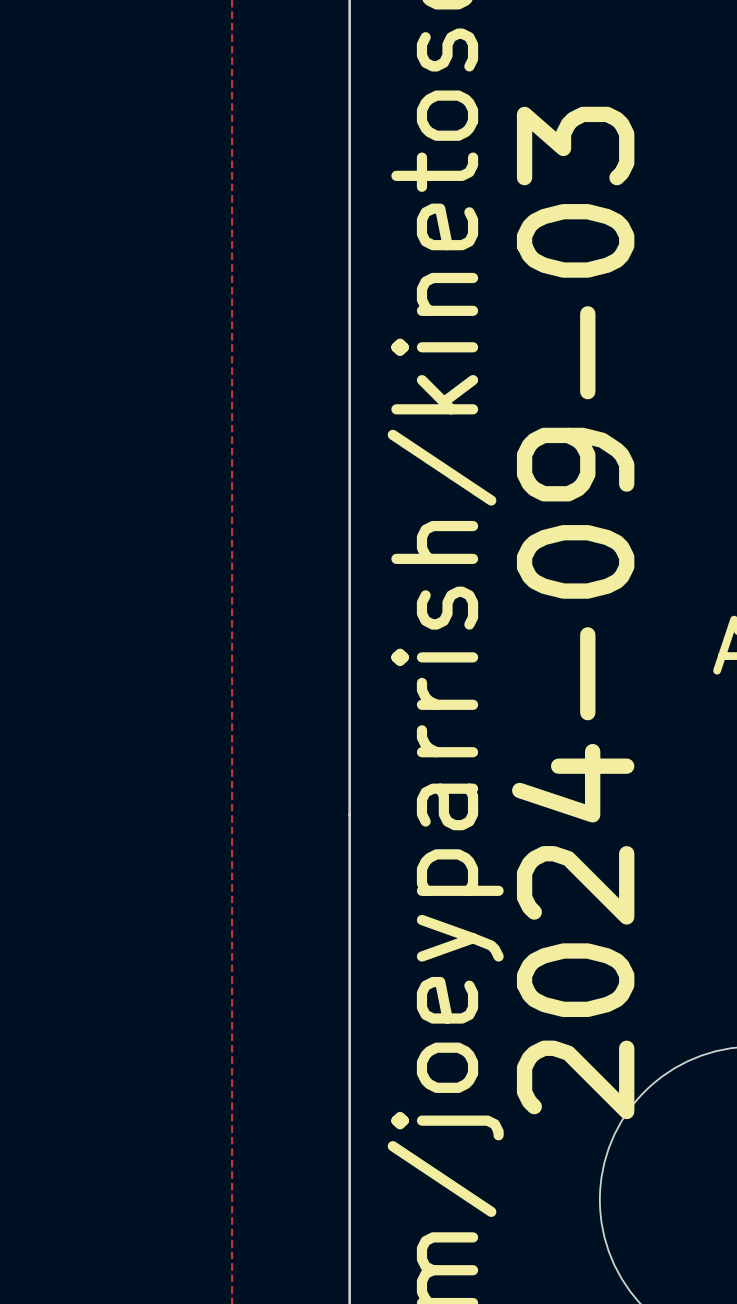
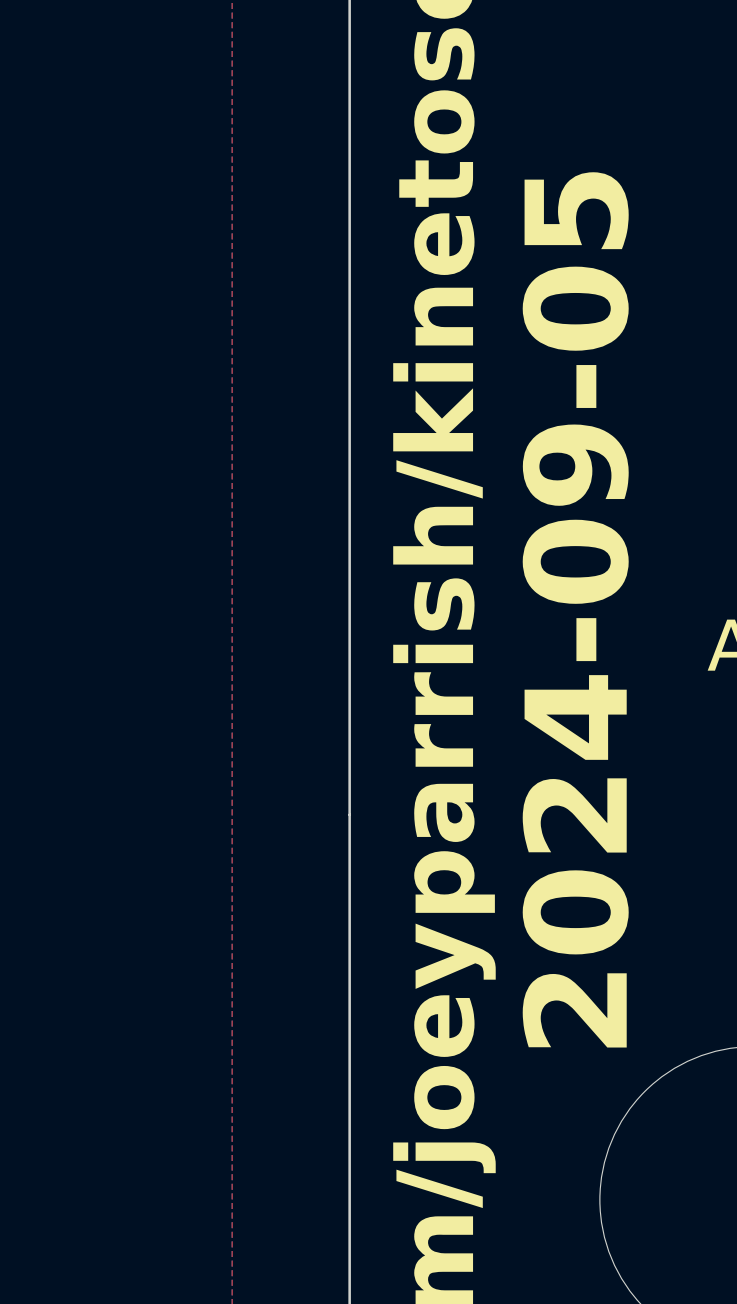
text: 2024-09-03 (573, 612) -> 2024-09-05 (575, 609)

